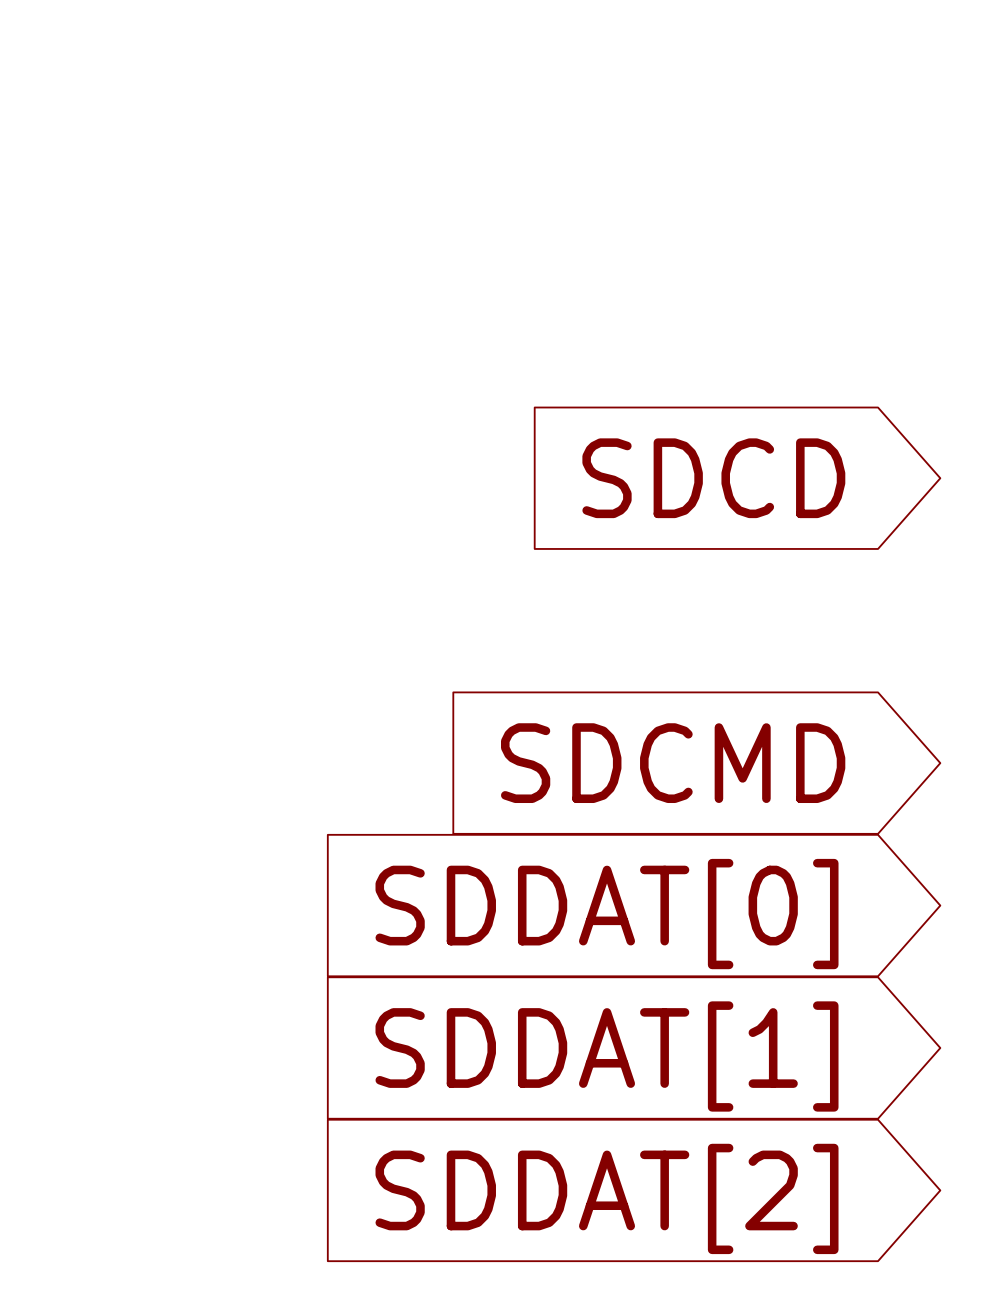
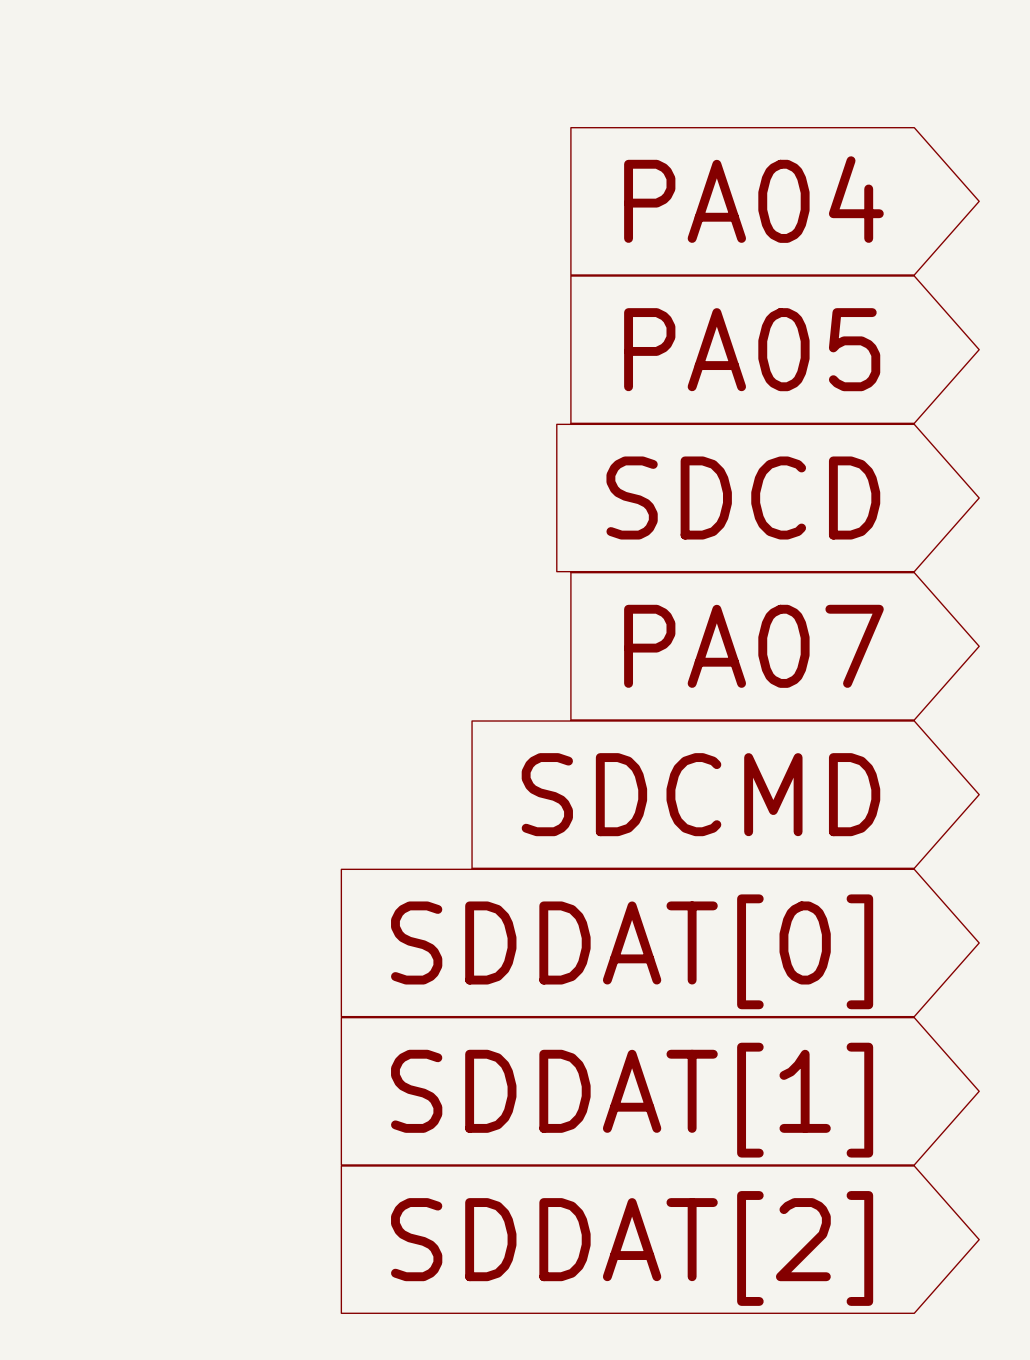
global label: none -> PA04 (753, 199)
global label: none -> PA05 (752, 349)
global label: none -> PA07 (753, 646)

